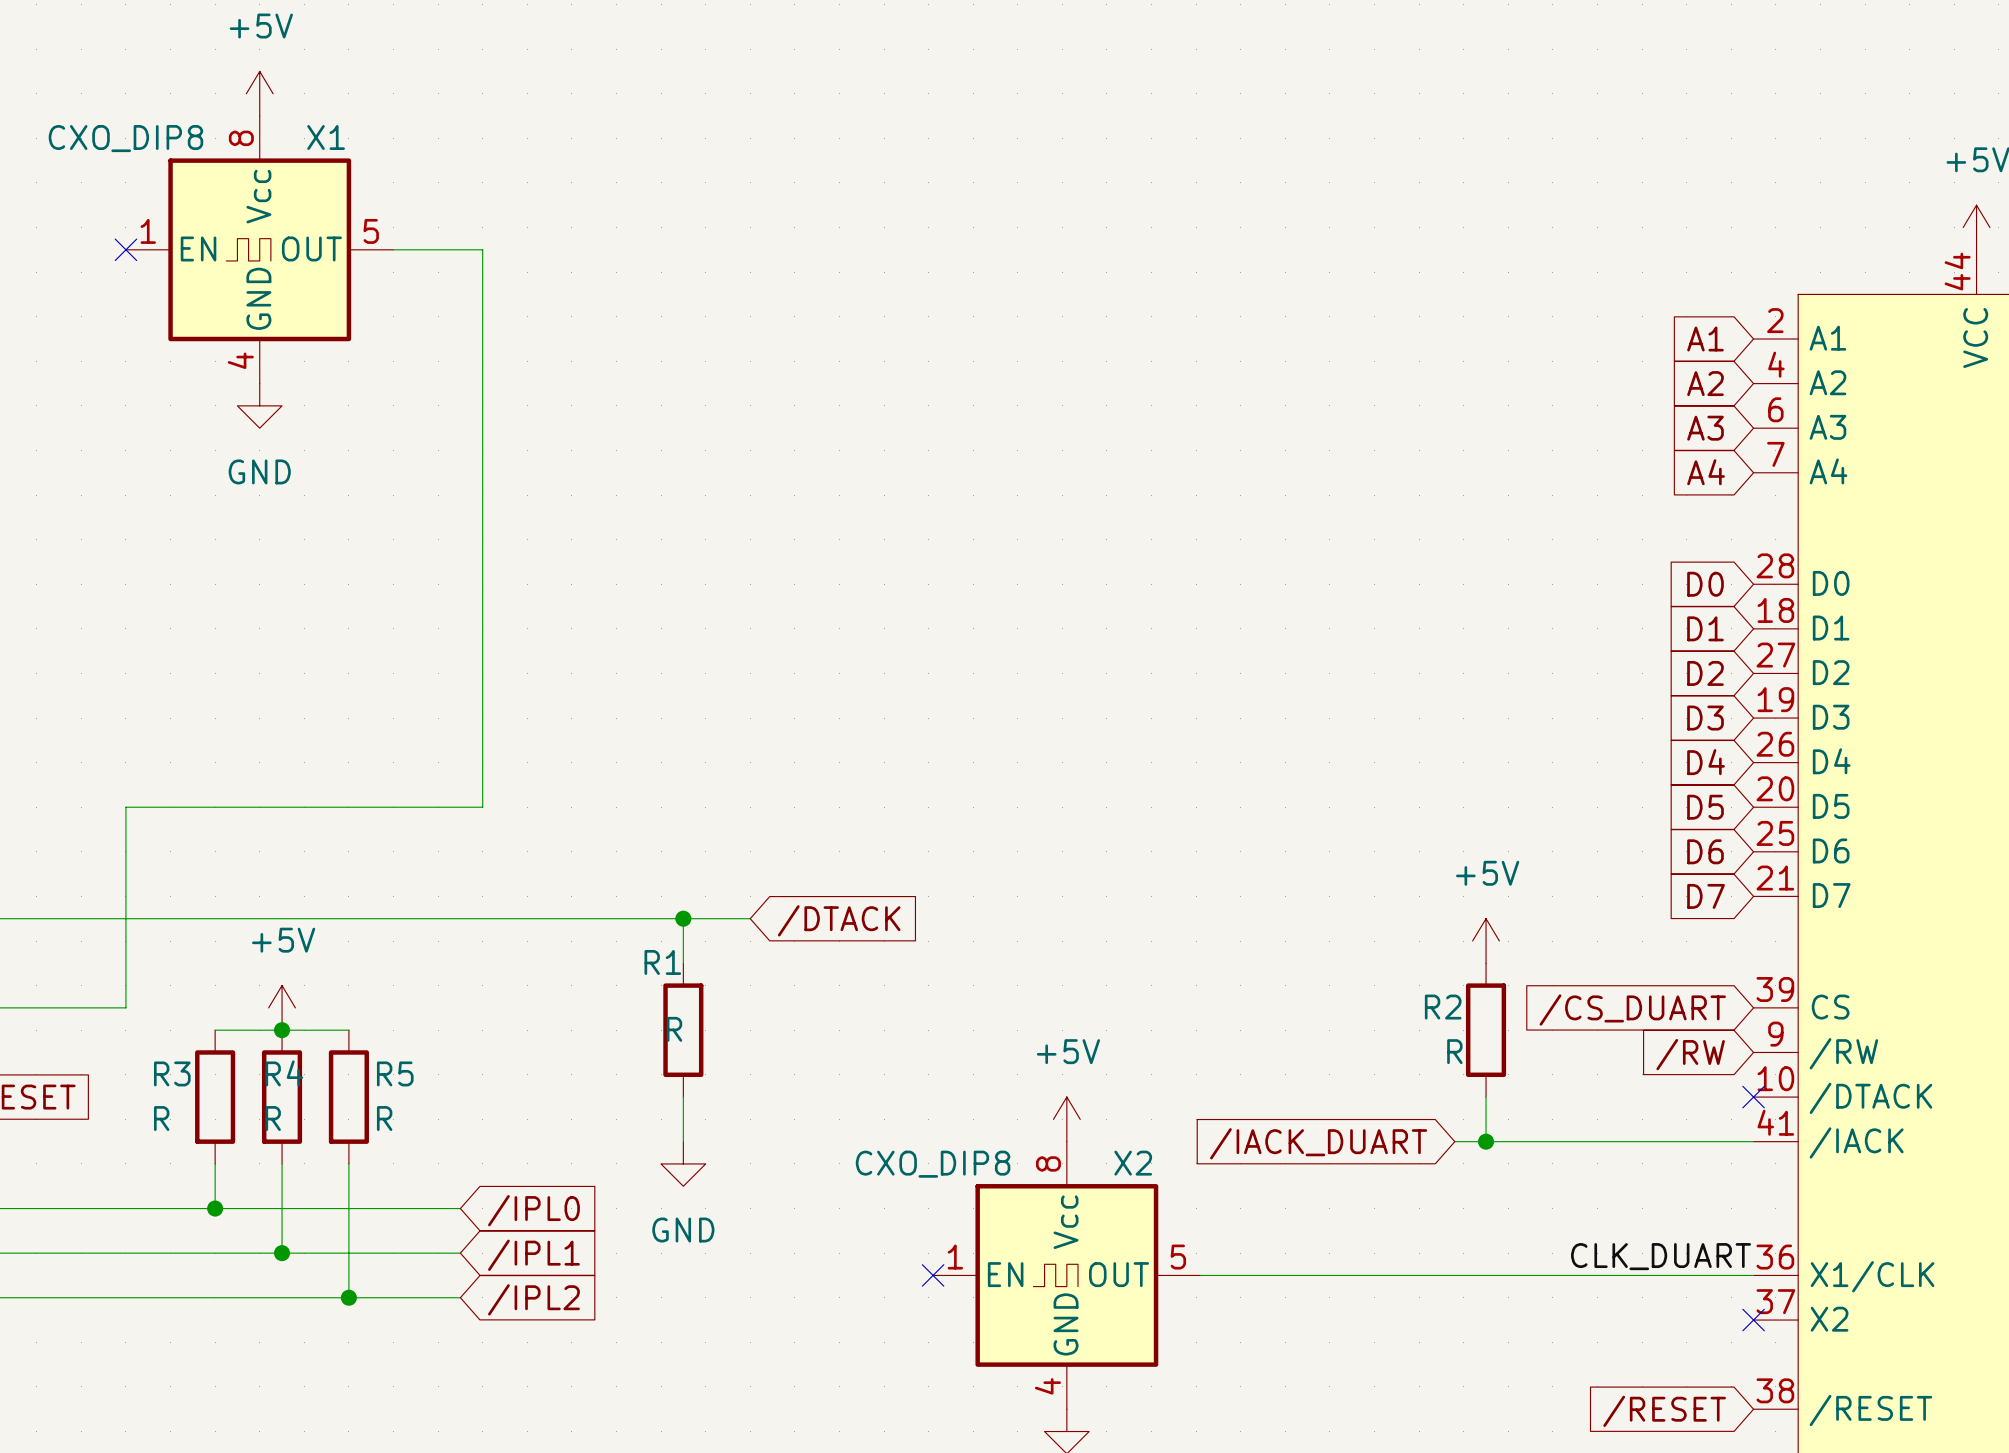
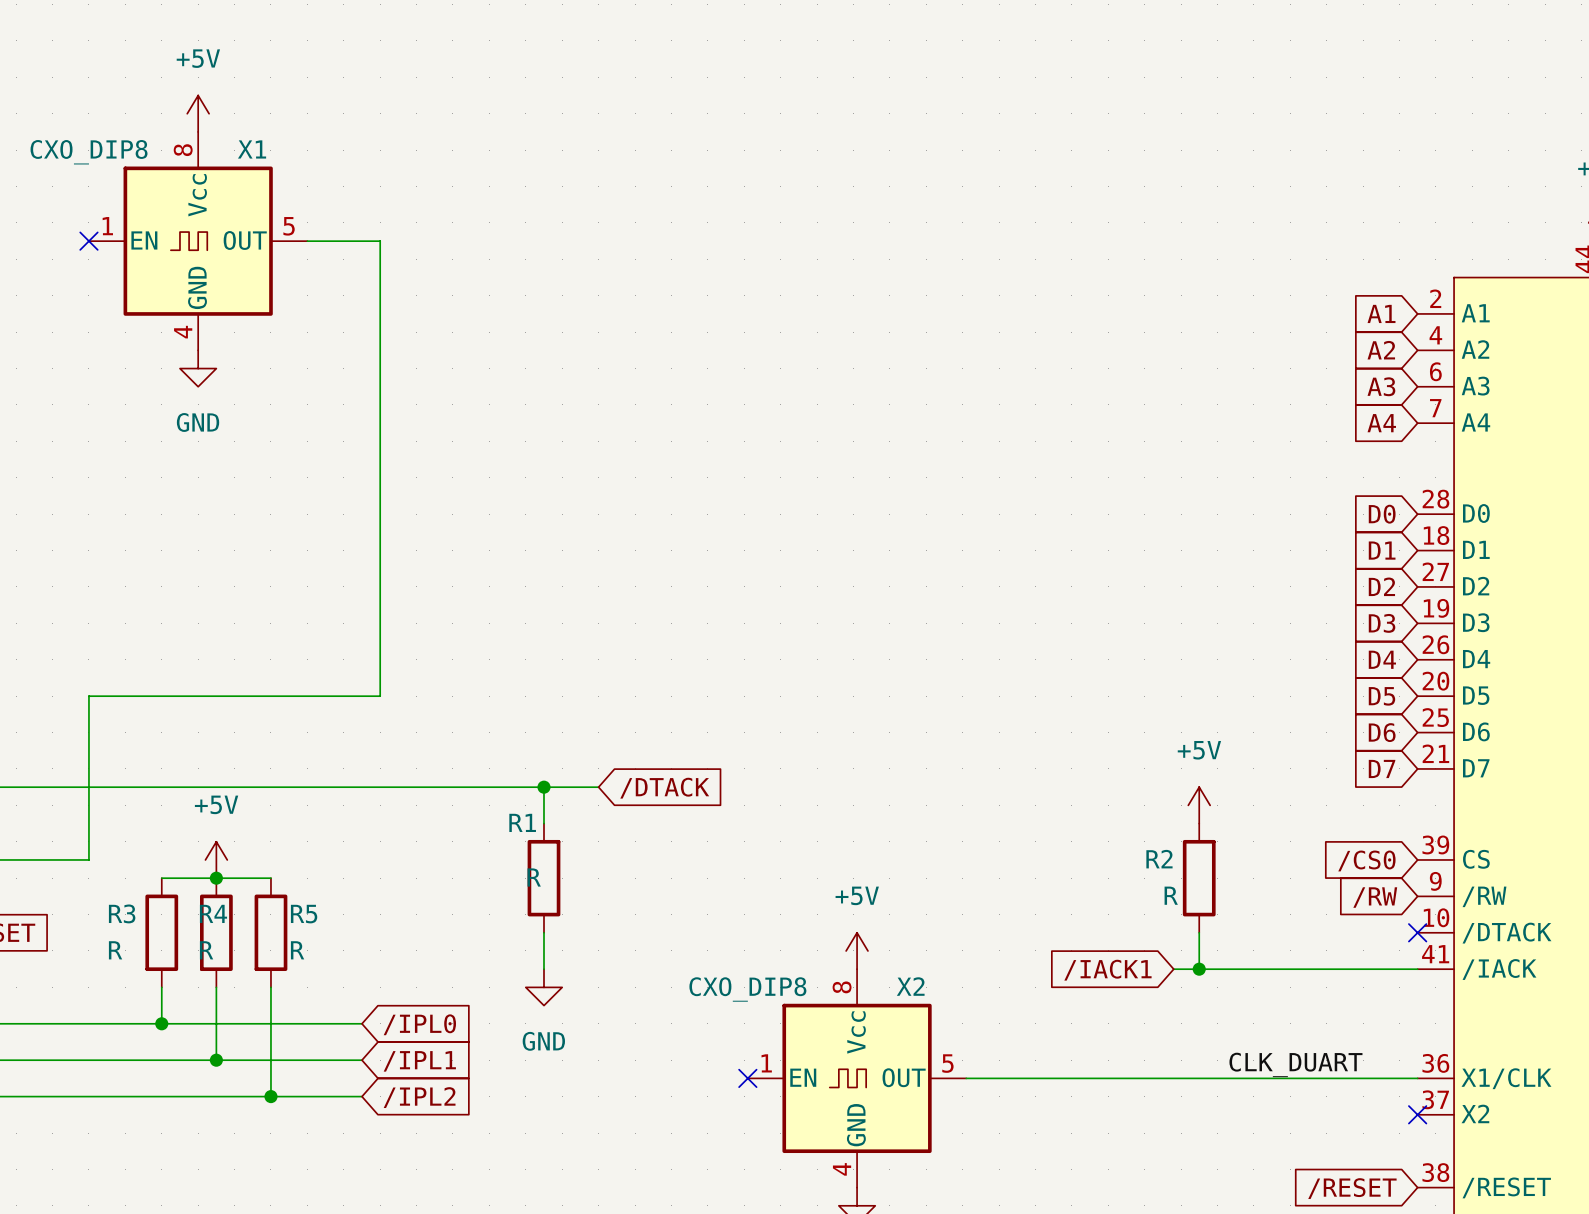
global label: /CS_DUART (1632, 1010) -> /CS0 (1366, 860)
global label: /IACK_DUART (1318, 1143) -> /IACK1 (1107, 970)
label position: CLK_DUART (1661, 1256) -> CLK_DUART (1295, 1064)

